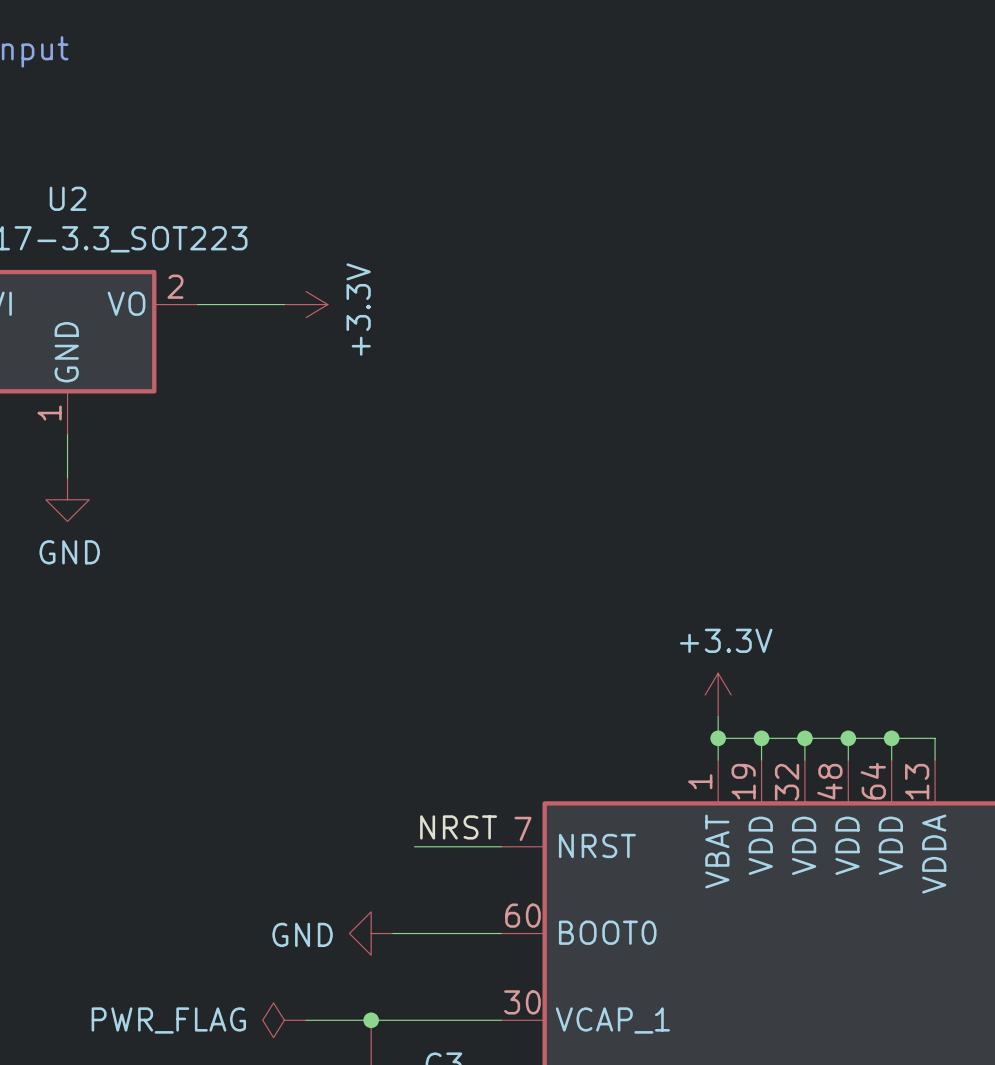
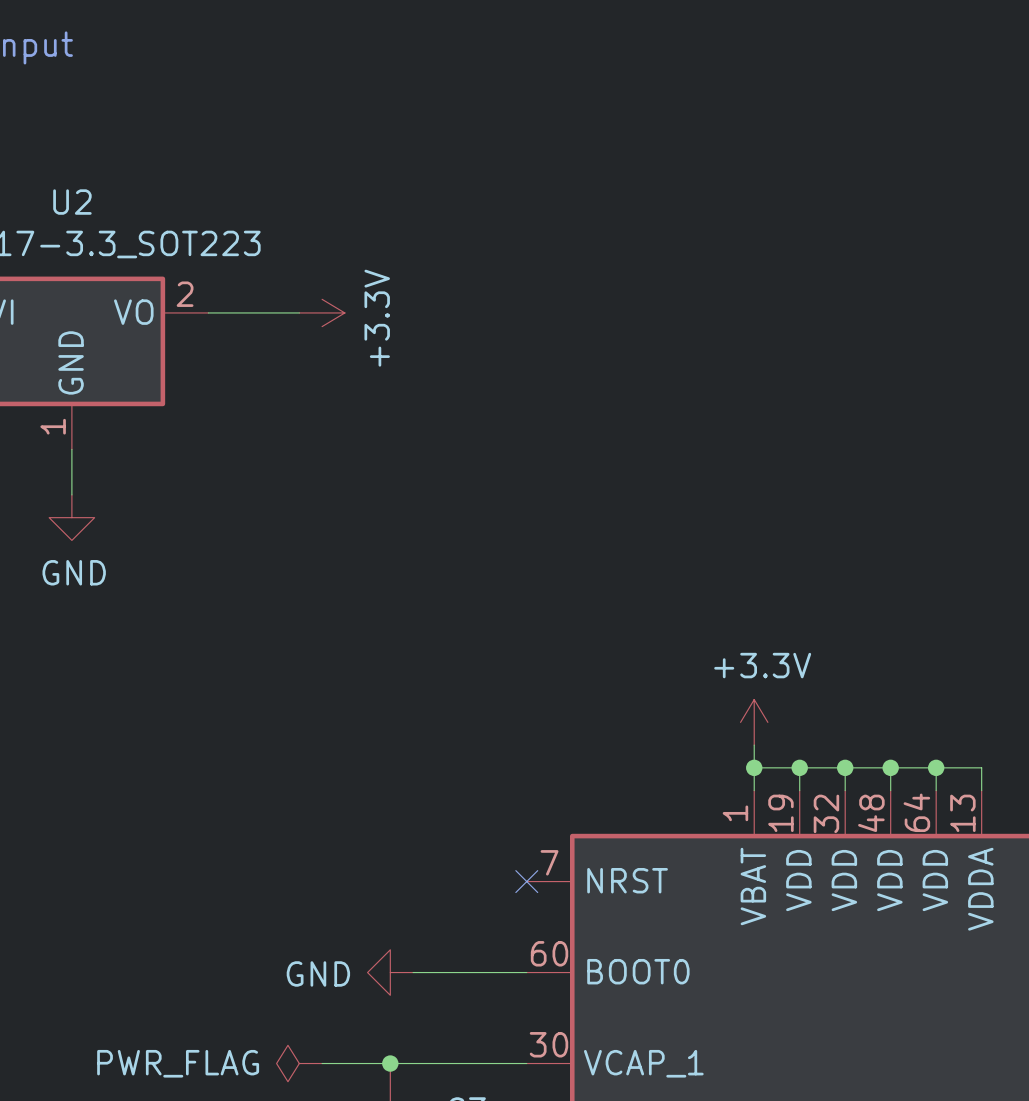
label: NRST (458, 827) -> none
wire: (414, 846) (501, 846) -> none
no-connect mark: none -> (526, 881)

